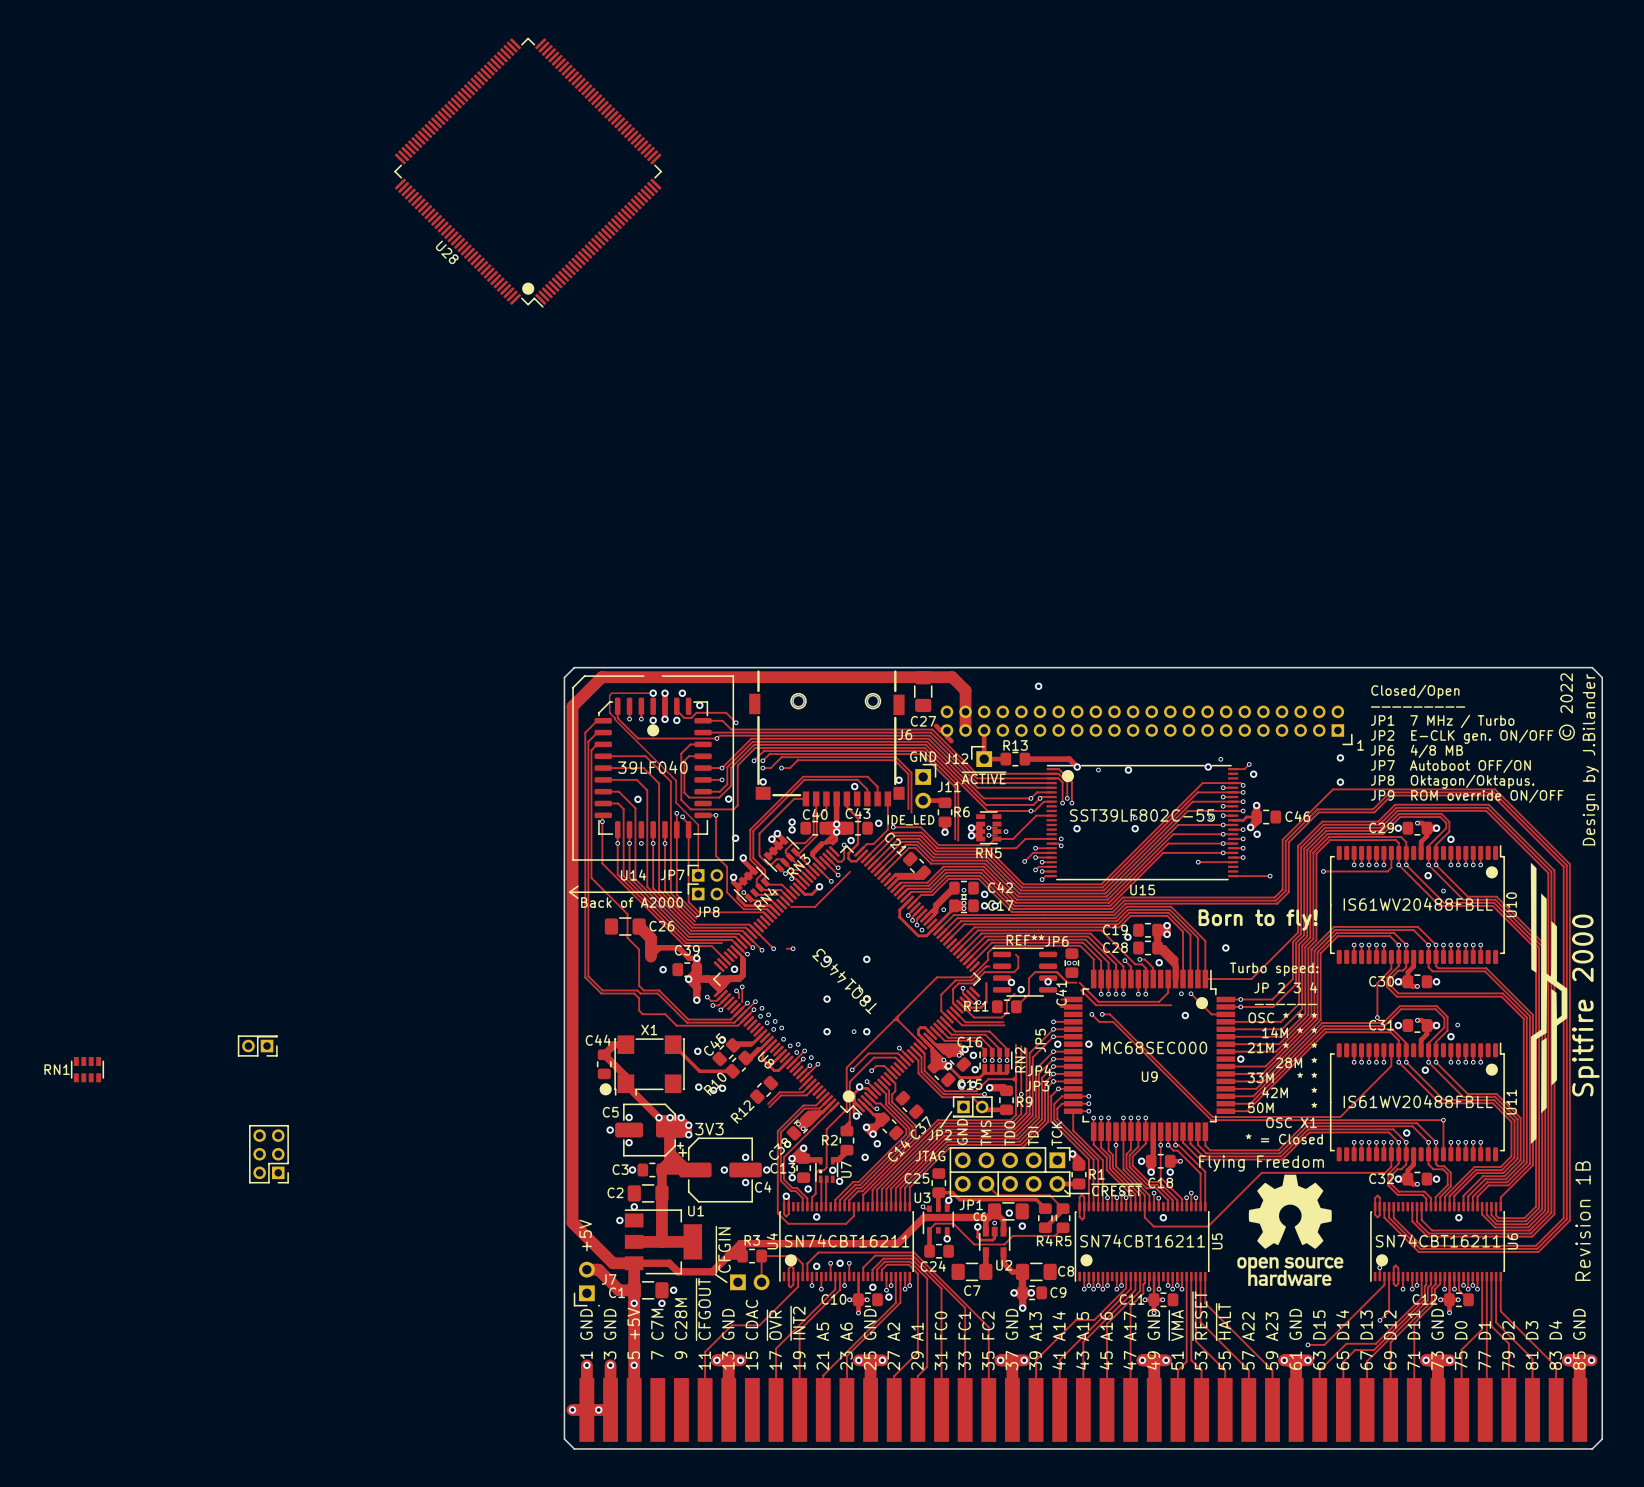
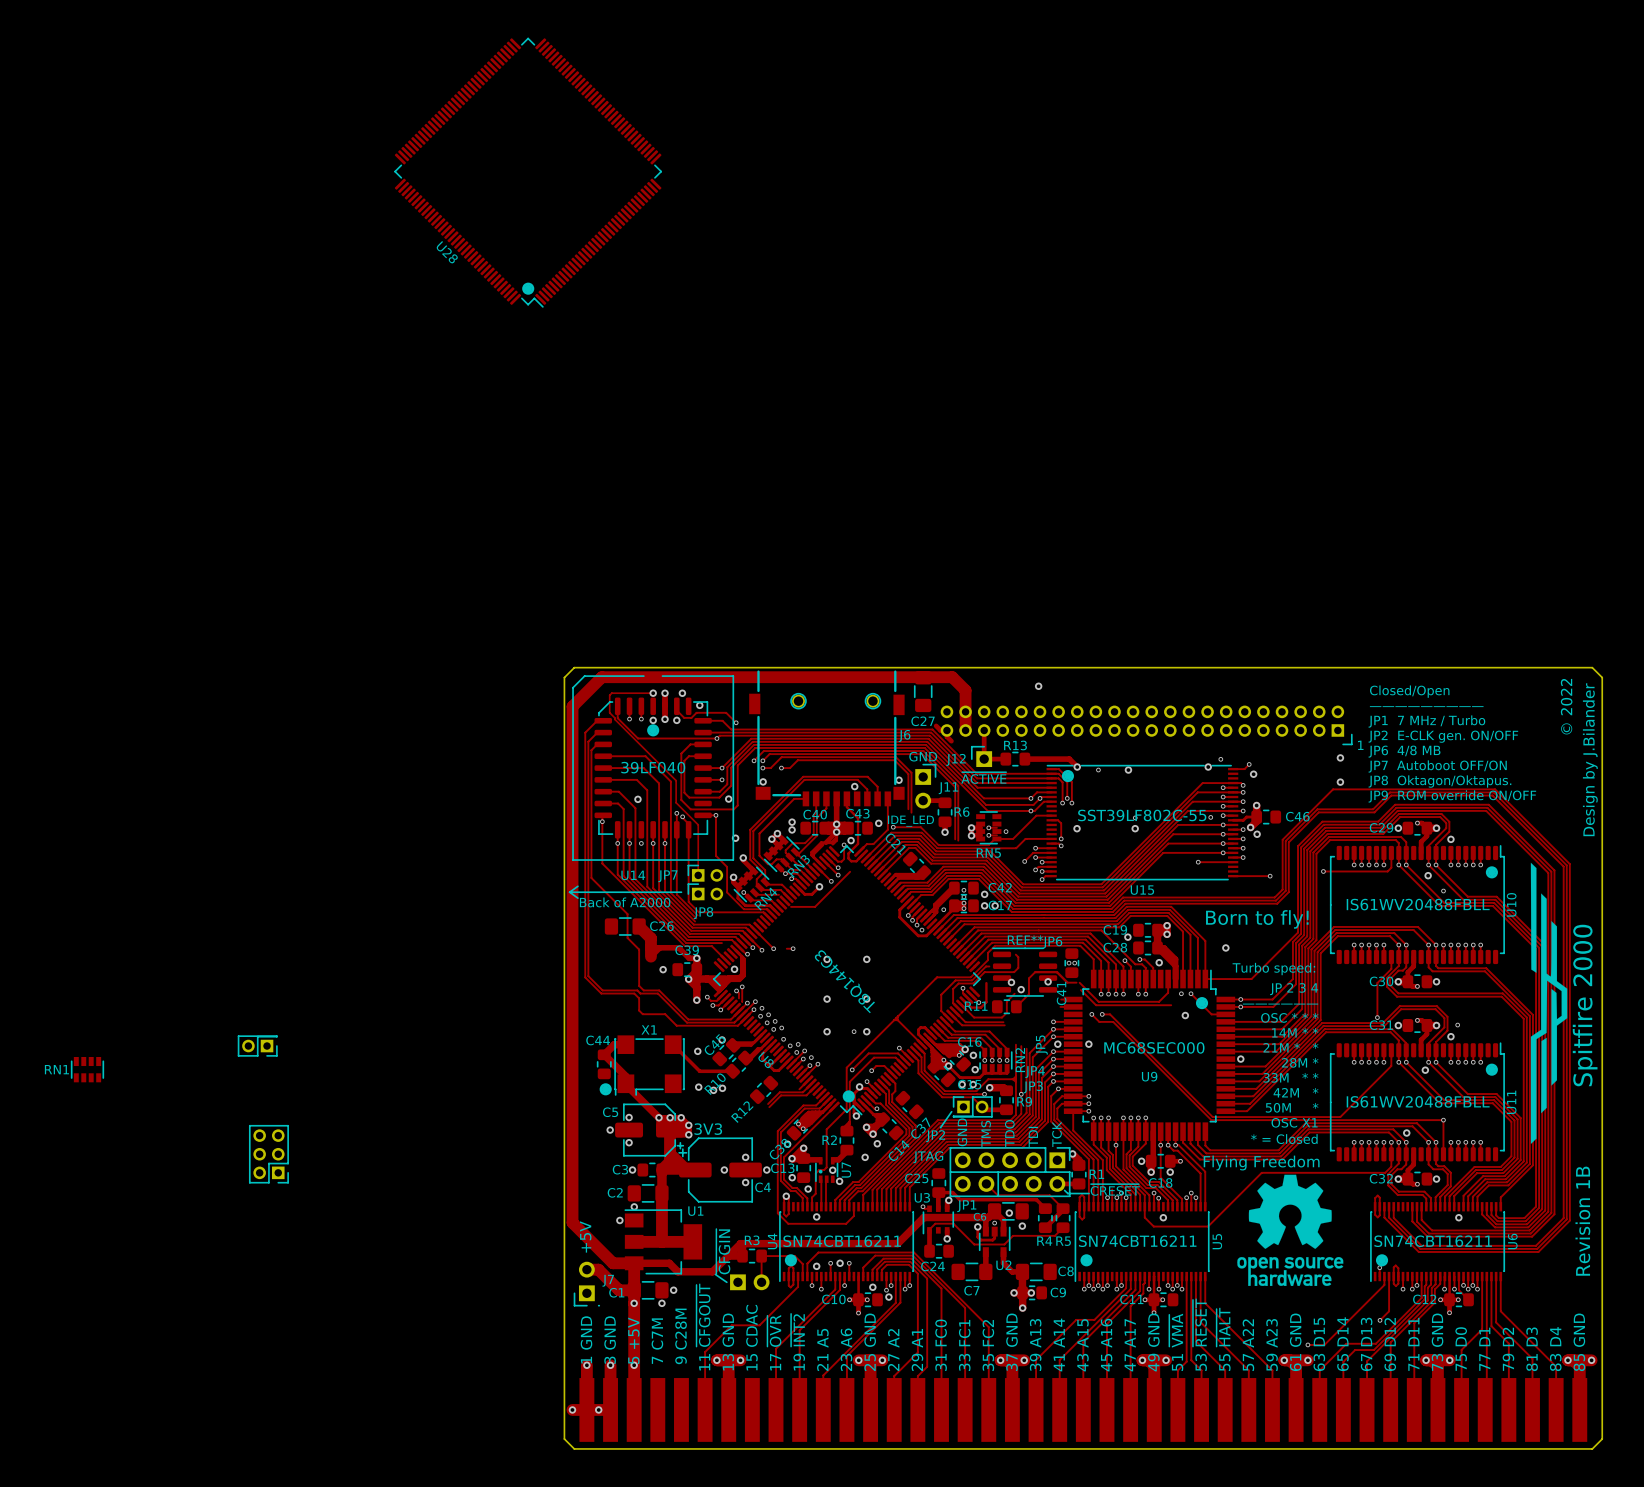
track: none -> (1051, 820) (1058, 820) (1061, 823) (1061, 838)

